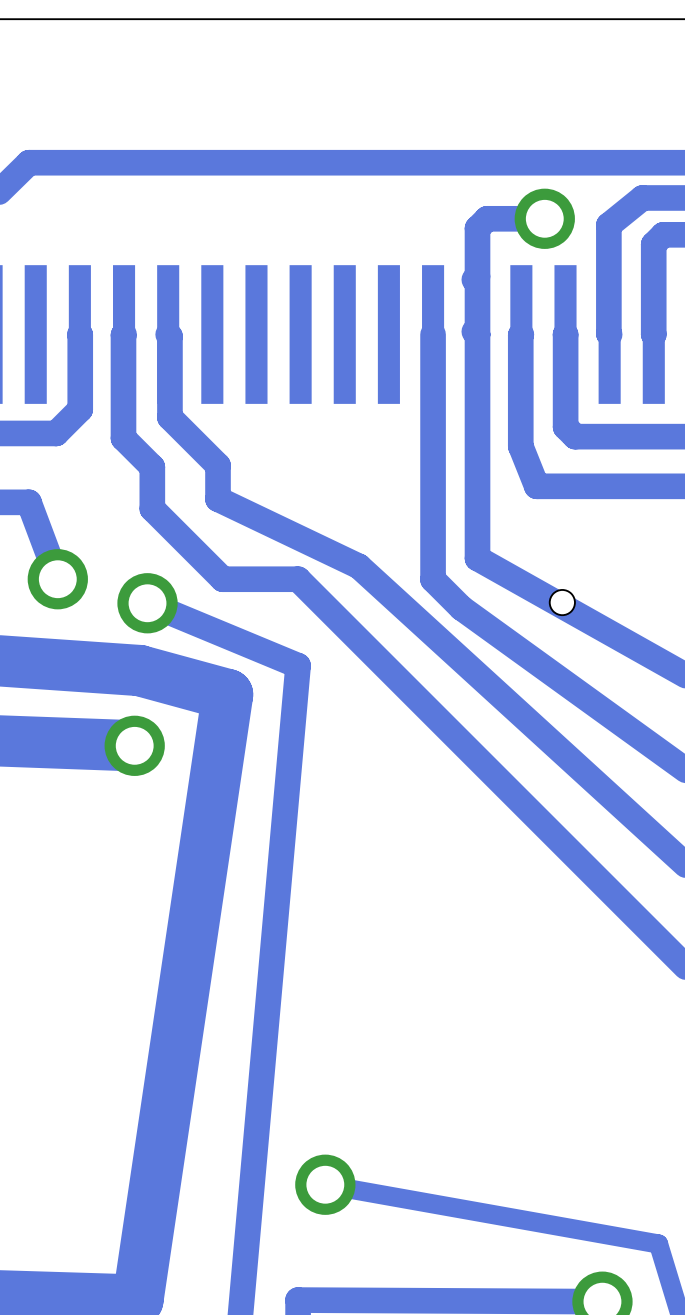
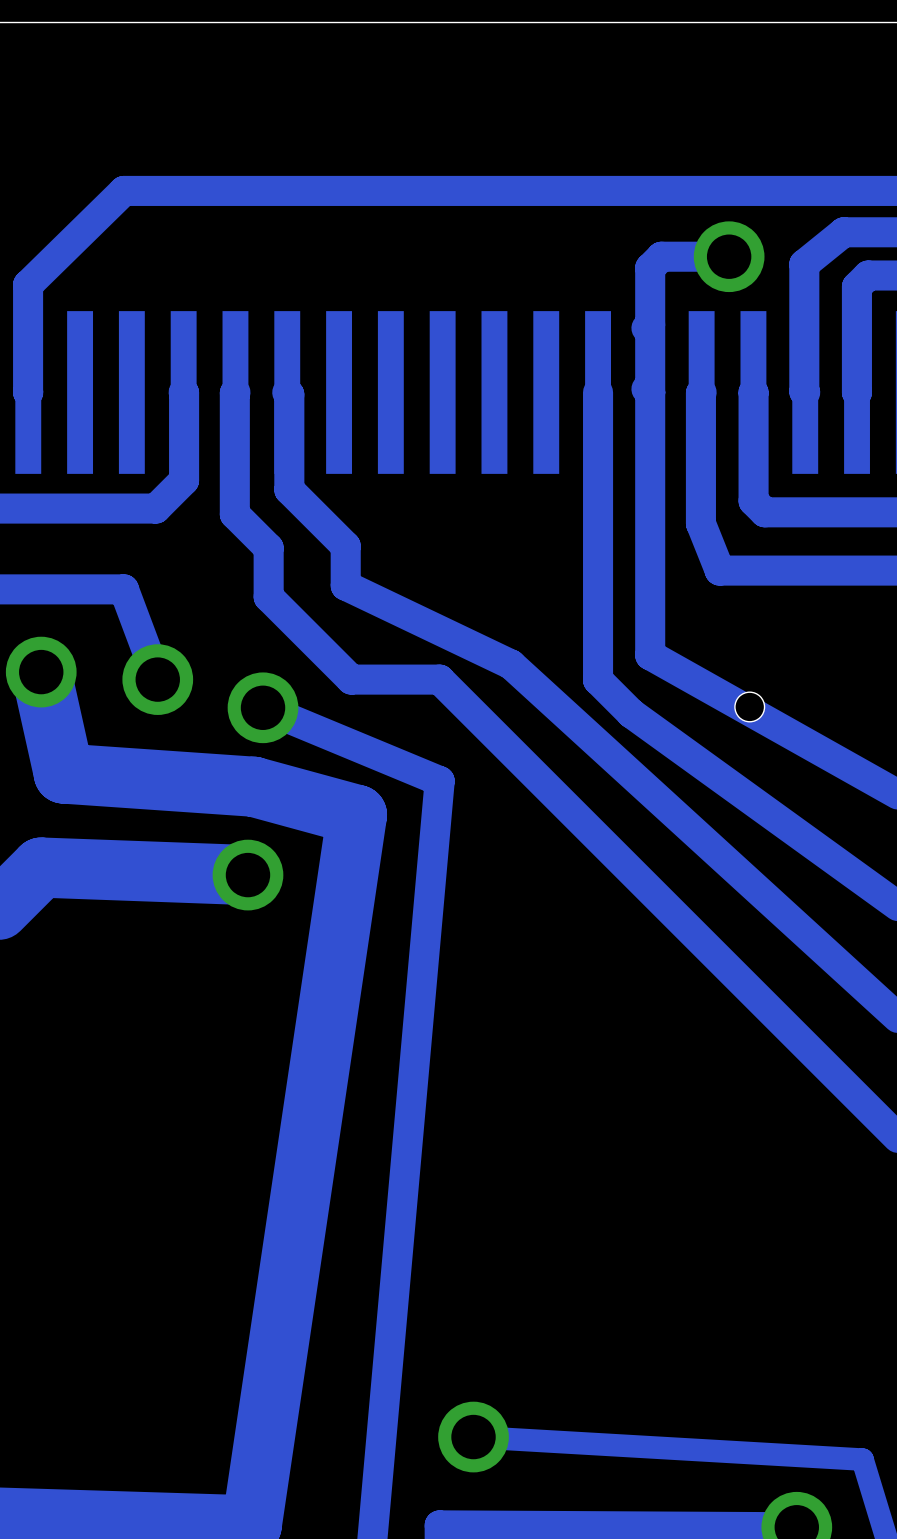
track: (325, 1184) (658, 1244) -> (473, 1437) (862, 1459)
via position: (325, 1184) -> (473, 1437)

